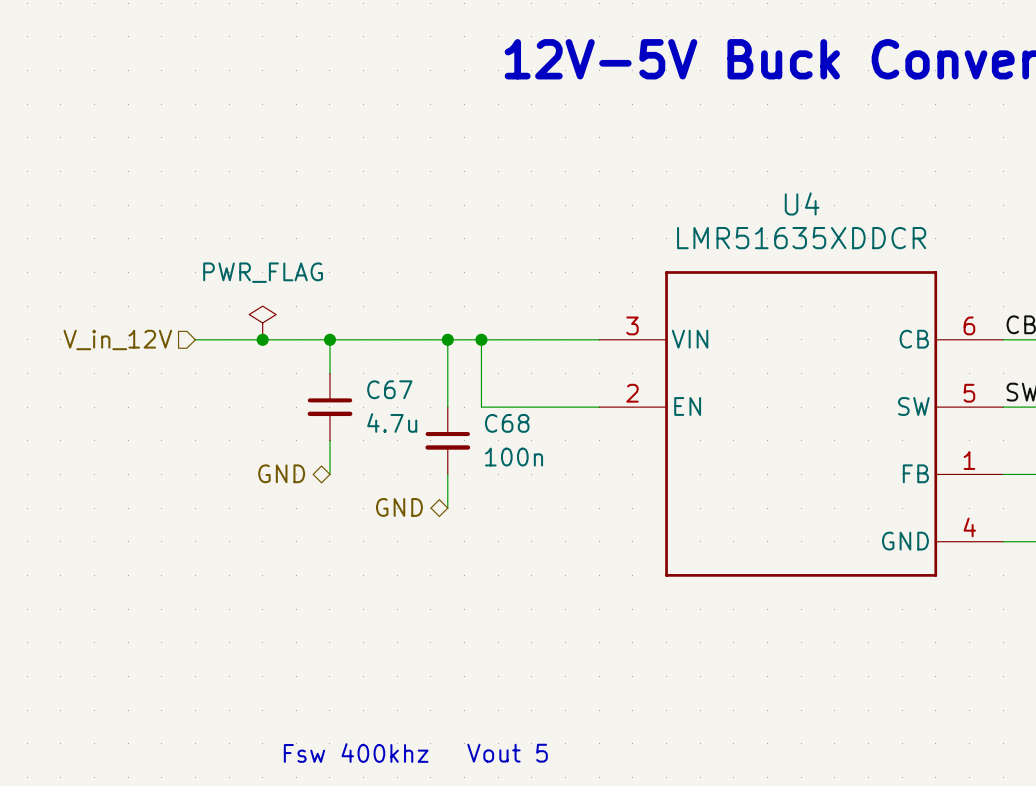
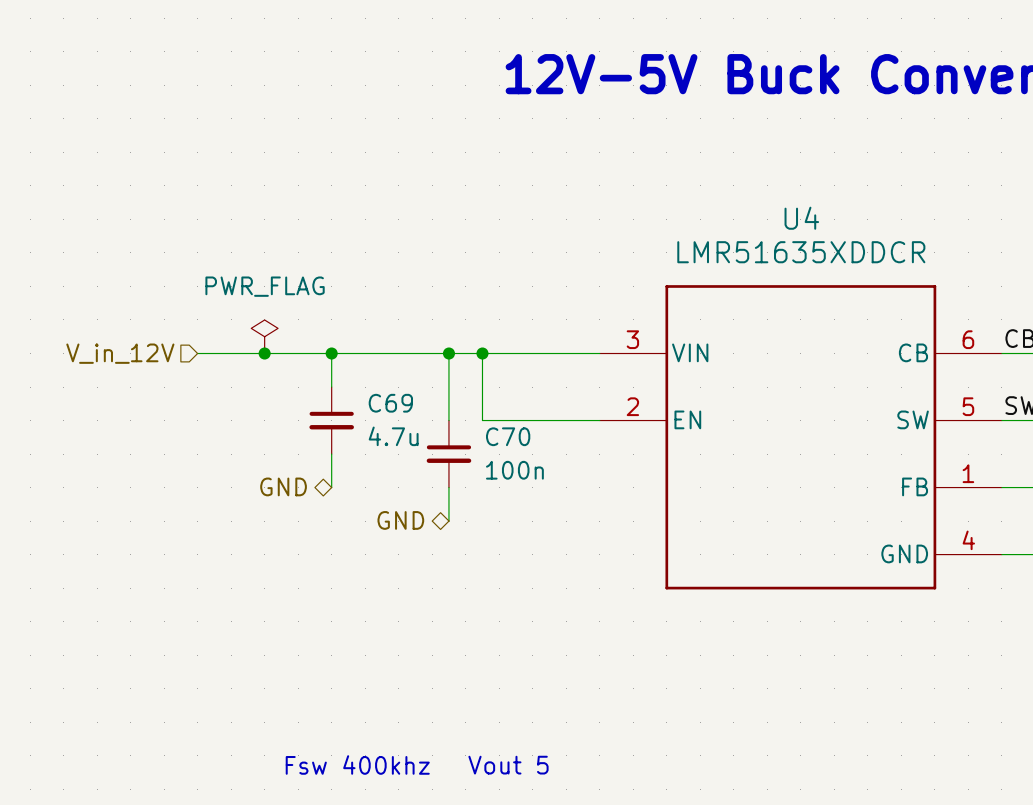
C67 name: C67 (389, 389) -> C69 (390, 403)
C68 name: C68 (507, 423) -> C70 (508, 436)

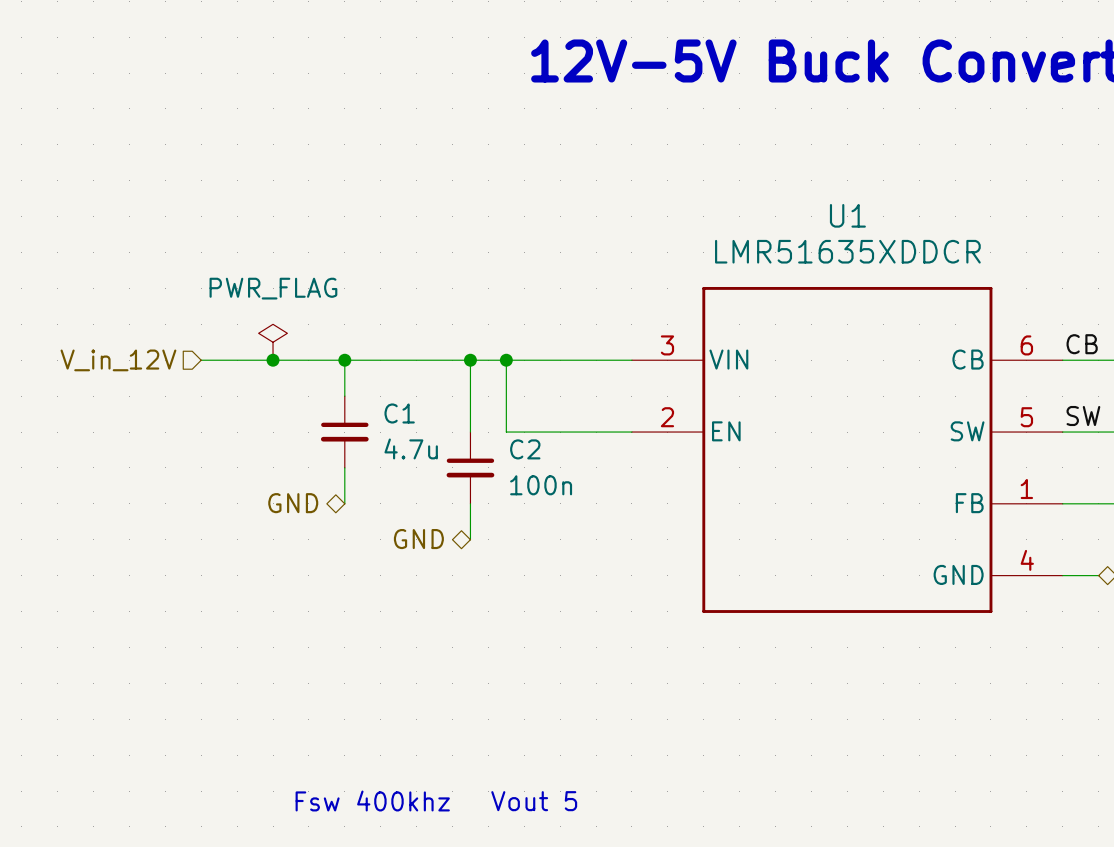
U4 name: U4 (801, 218) -> U1 (847, 215)
C69 name: C69 (390, 403) -> C1 (399, 413)
C70 name: C70 (508, 436) -> C2 (525, 449)

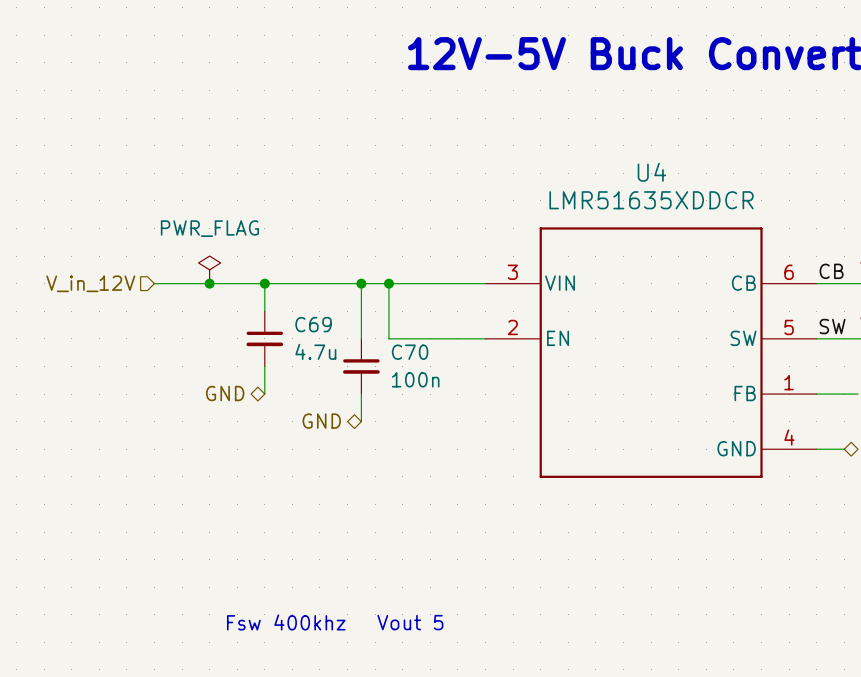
U1 name: U1 (847, 215) -> U4 (651, 172)
C1 name: C1 (399, 413) -> C69 (313, 324)
C2 name: C2 (525, 449) -> C70 (410, 352)

